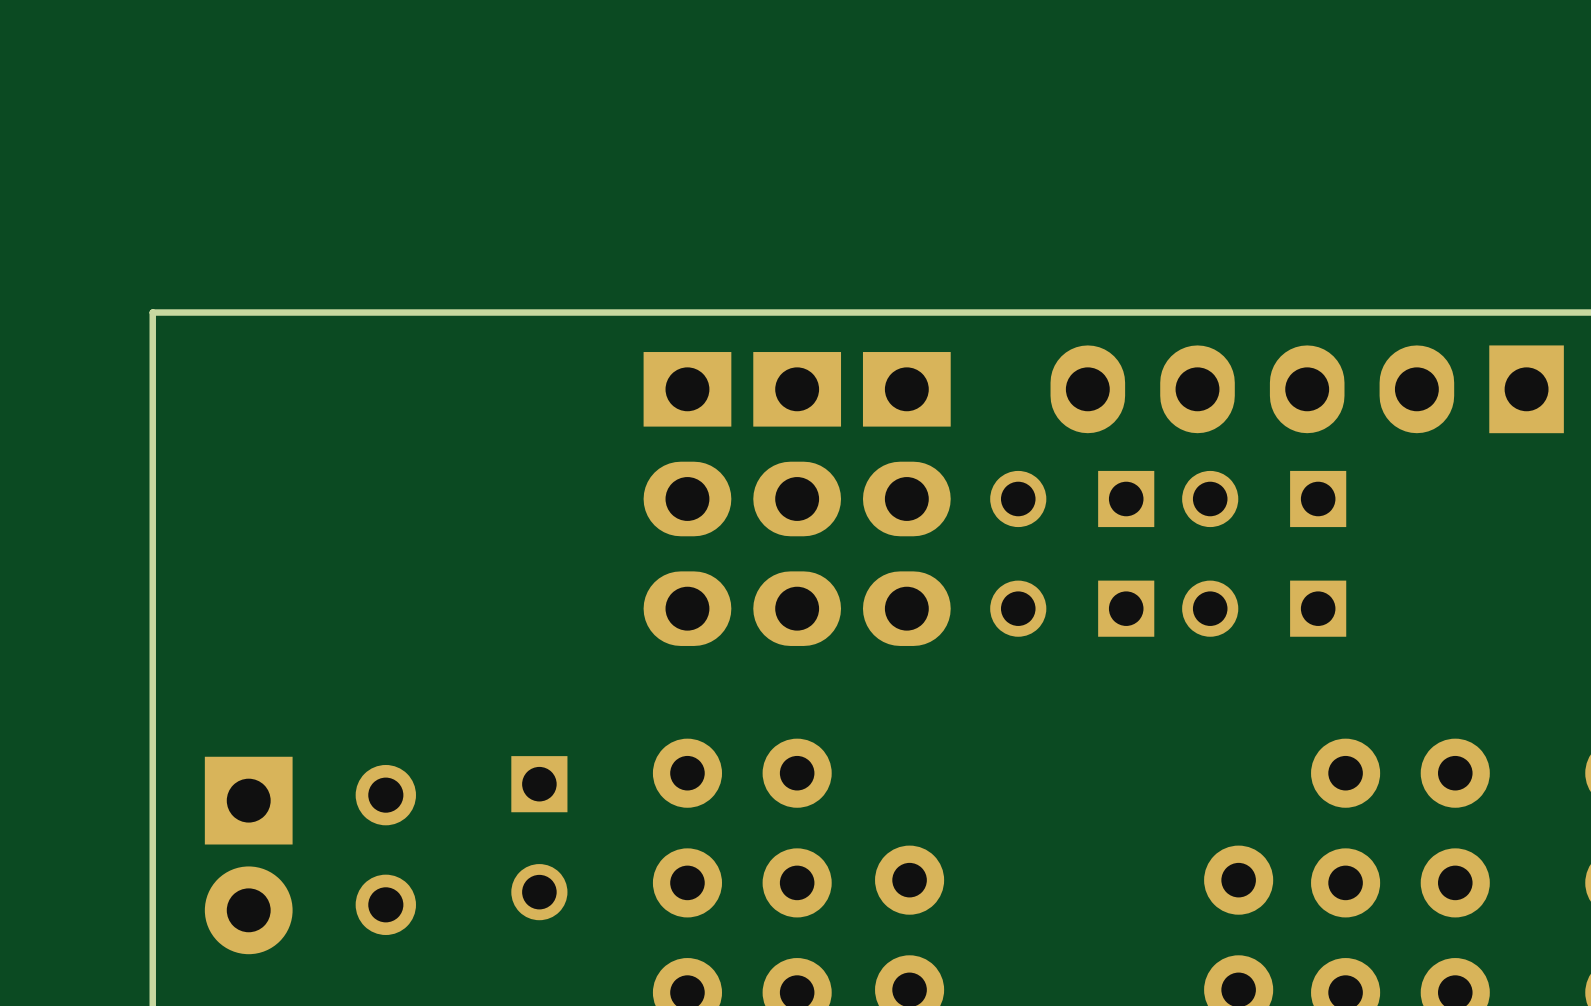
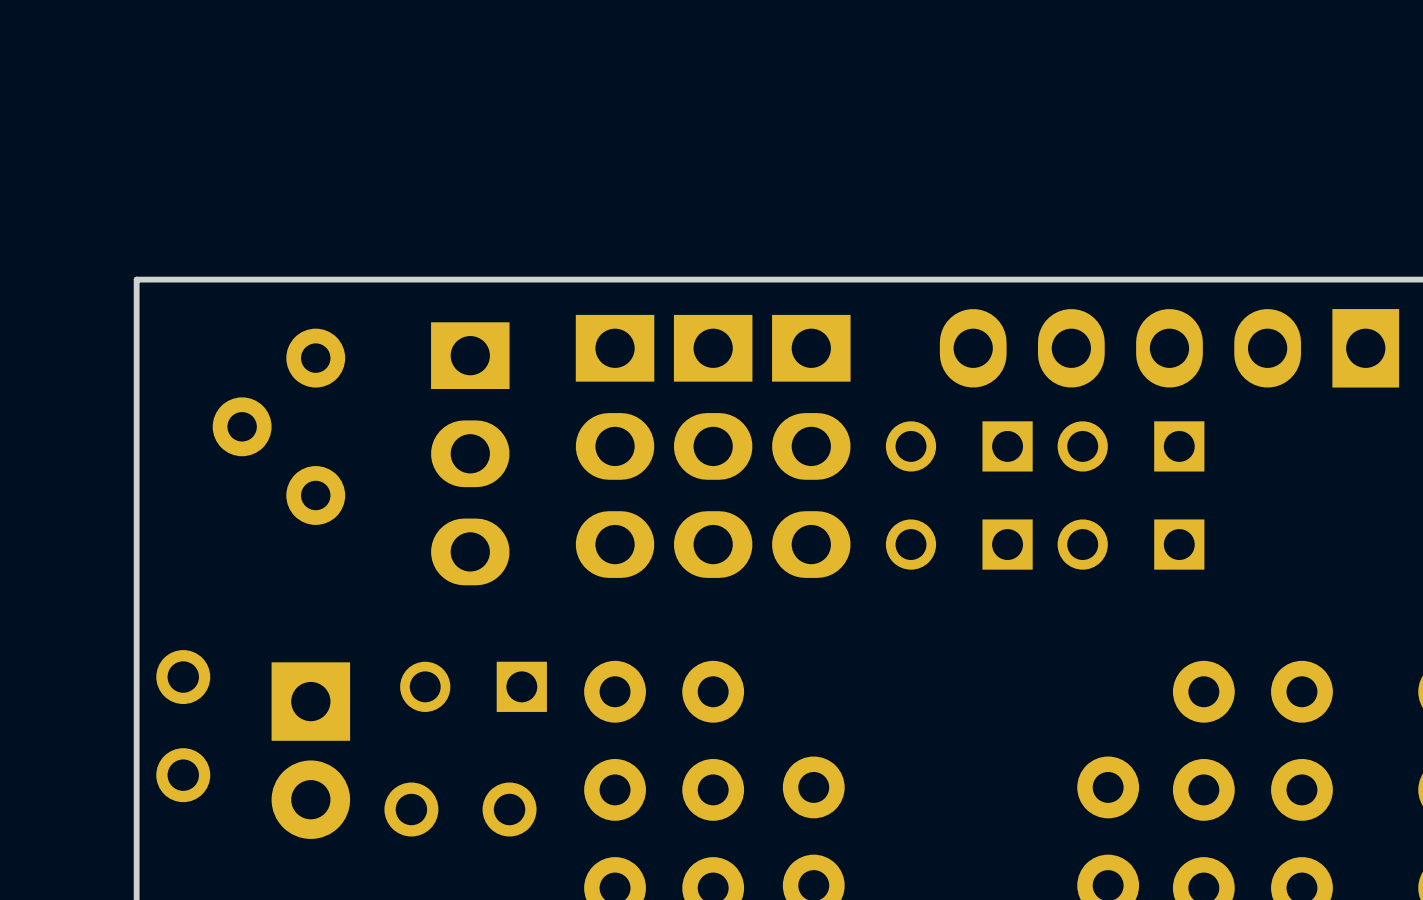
part: none -> (278, 426)
part: none -> (470, 453)
part footprint: [355, 764, 416, 936] -> [271, 662, 351, 839]
part: none -> (183, 726)
part rotation: 0° (539, 838) -> 90° clockwise (473, 686)
part: (248, 855) -> none
part: none -> (460, 809)

